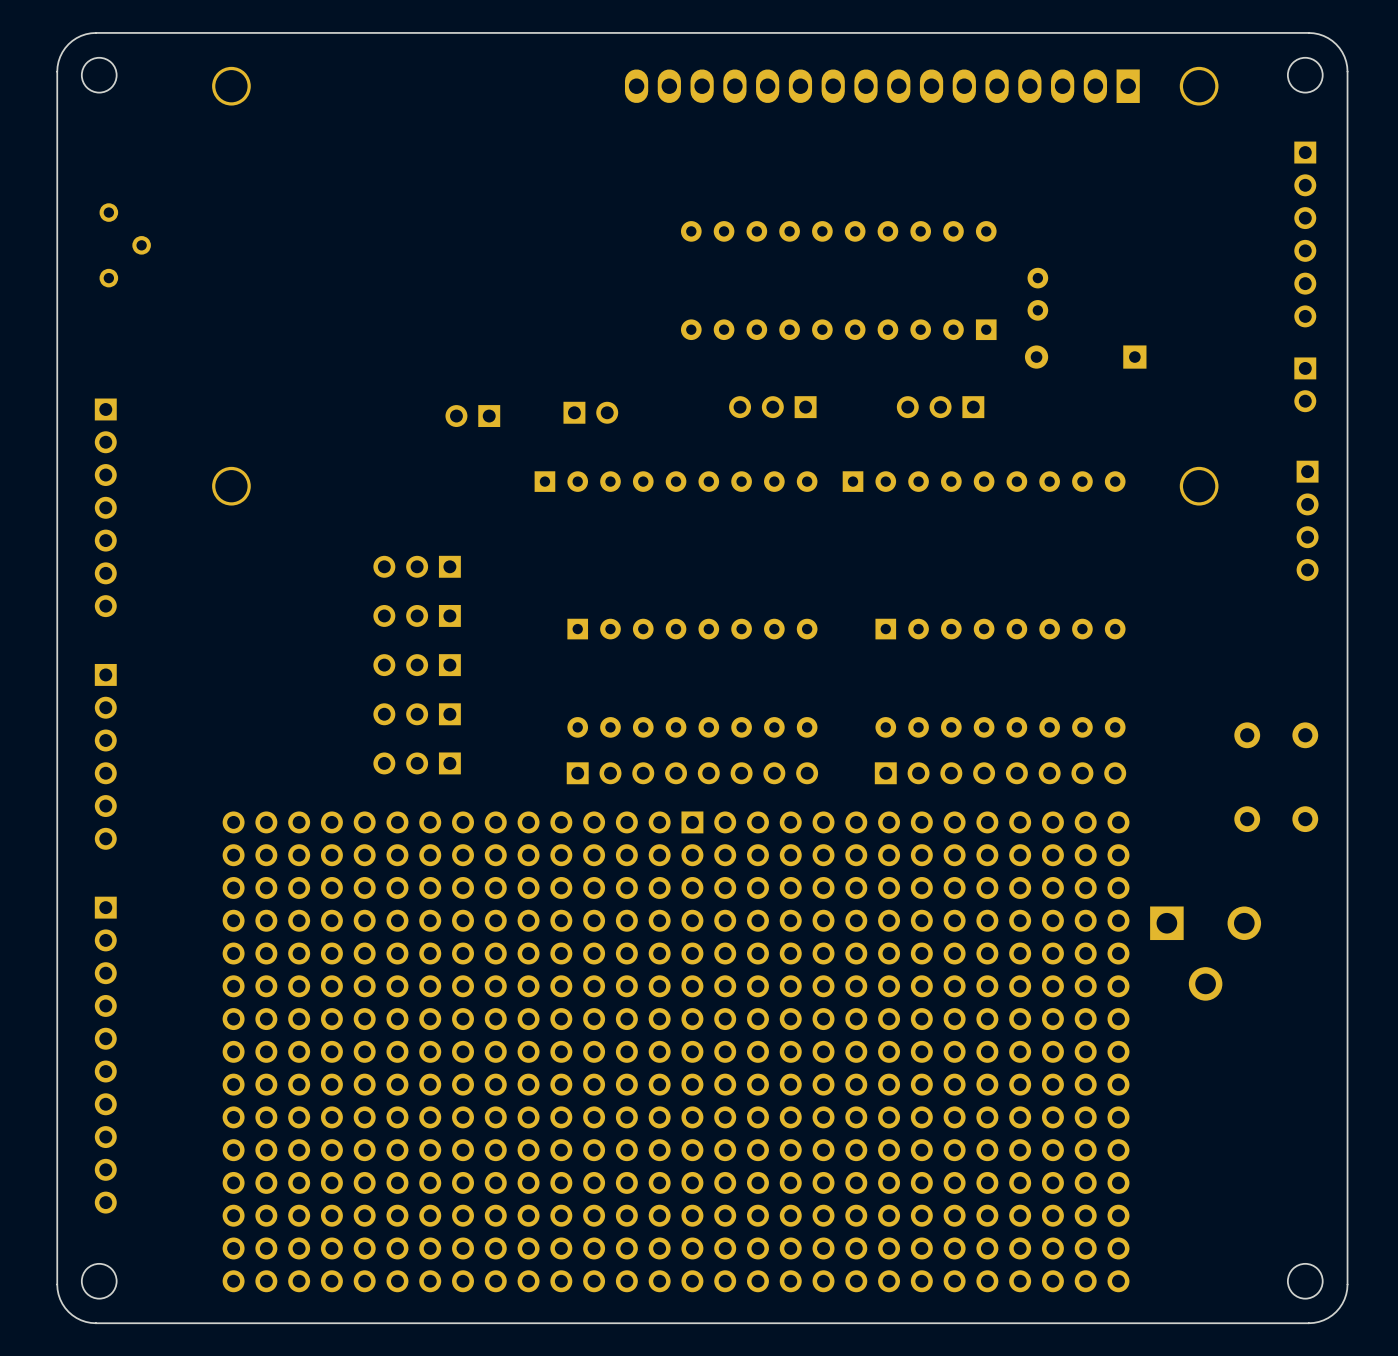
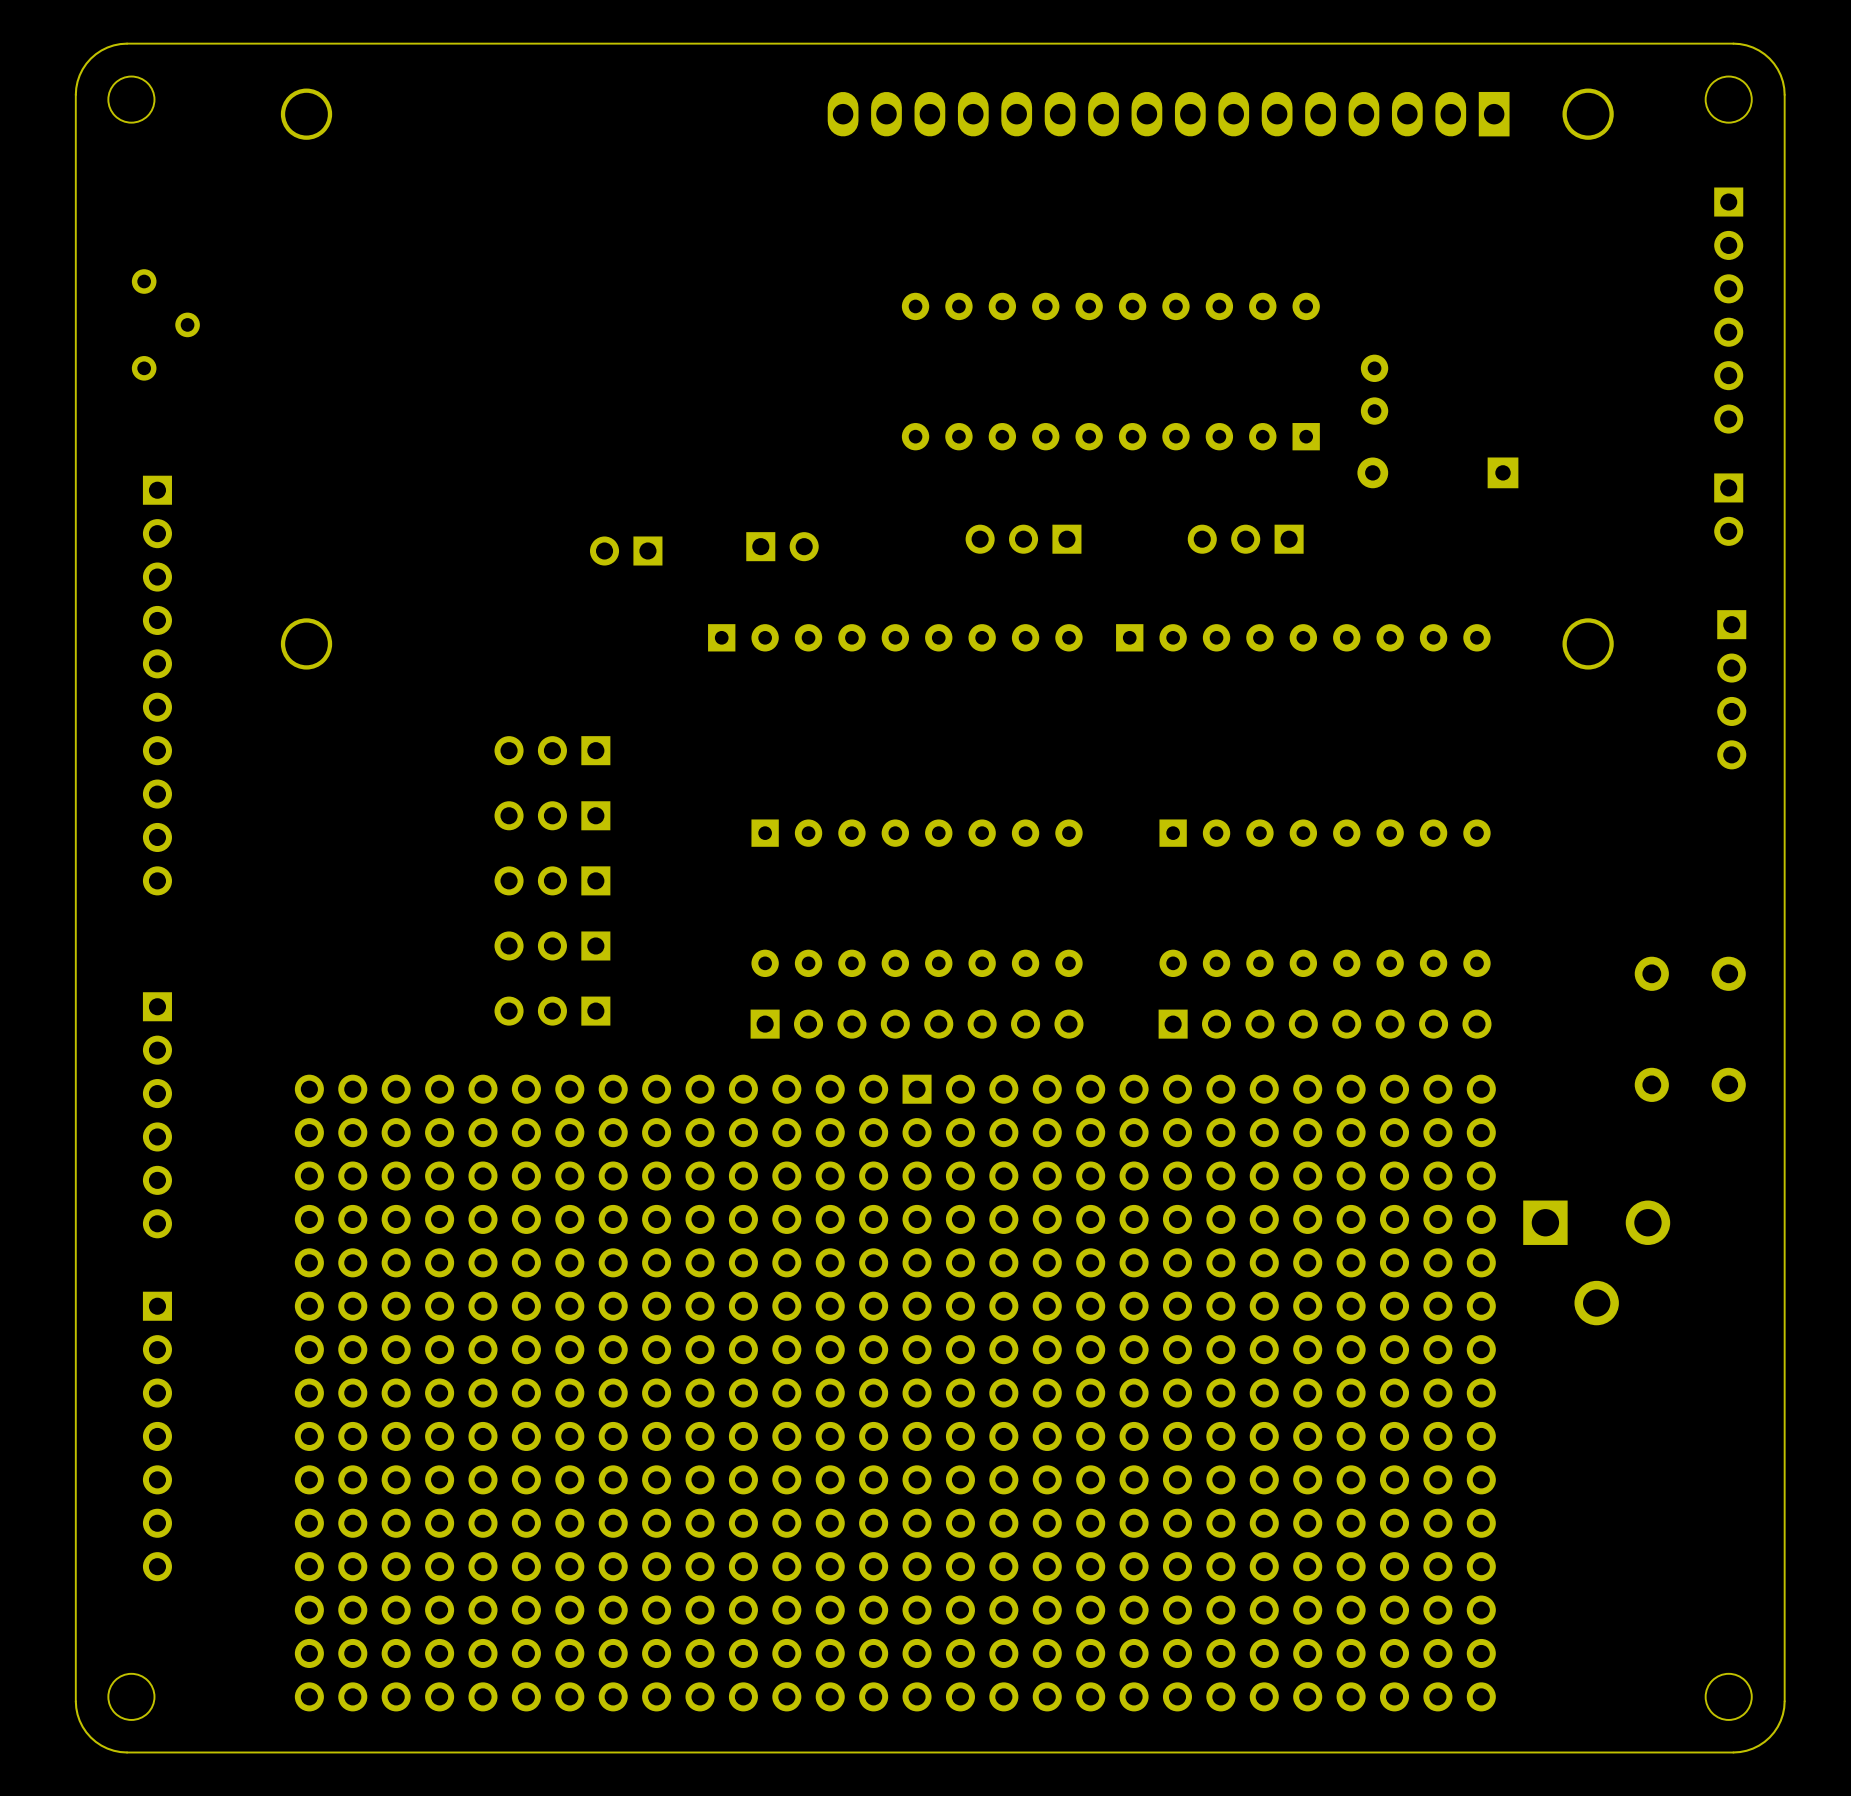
part: (105, 507) -> none
part: none -> (157, 685)
part position: (105, 756) -> (157, 1115)
part: (105, 1055) -> none
part: none -> (157, 1436)

